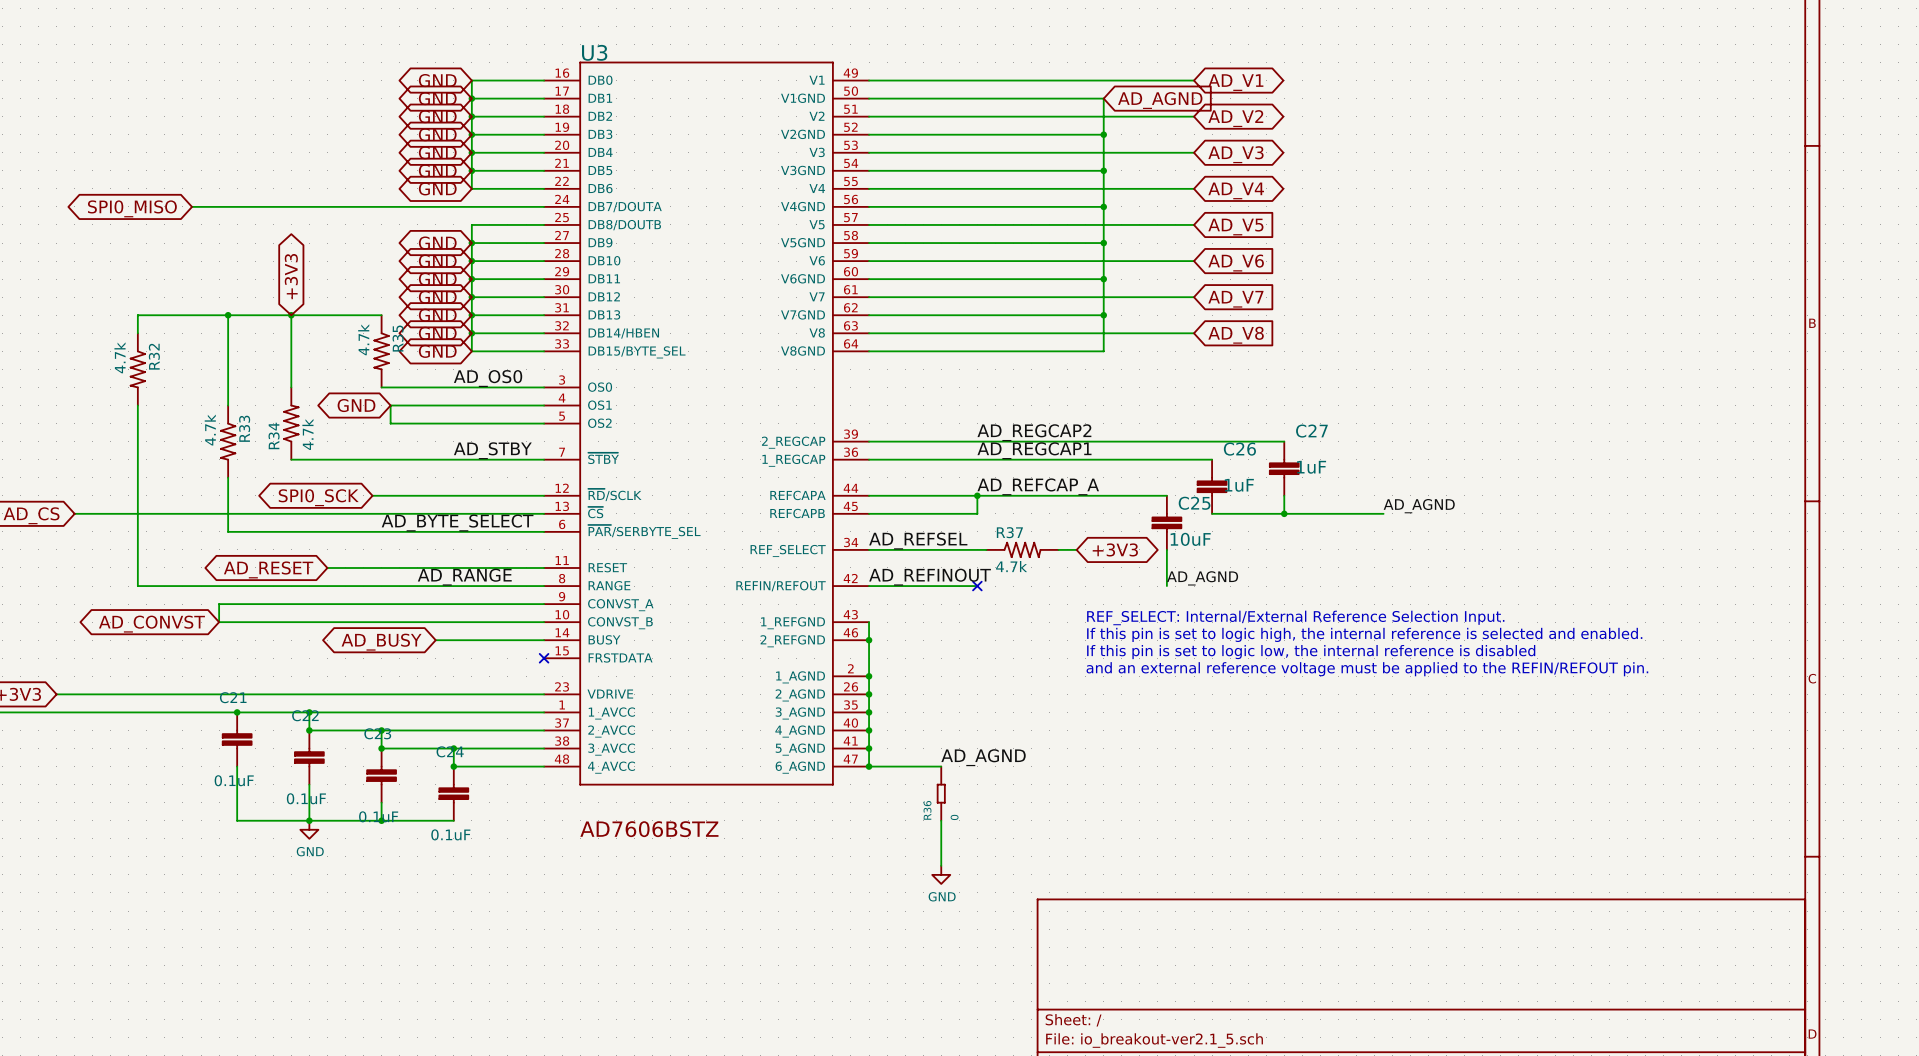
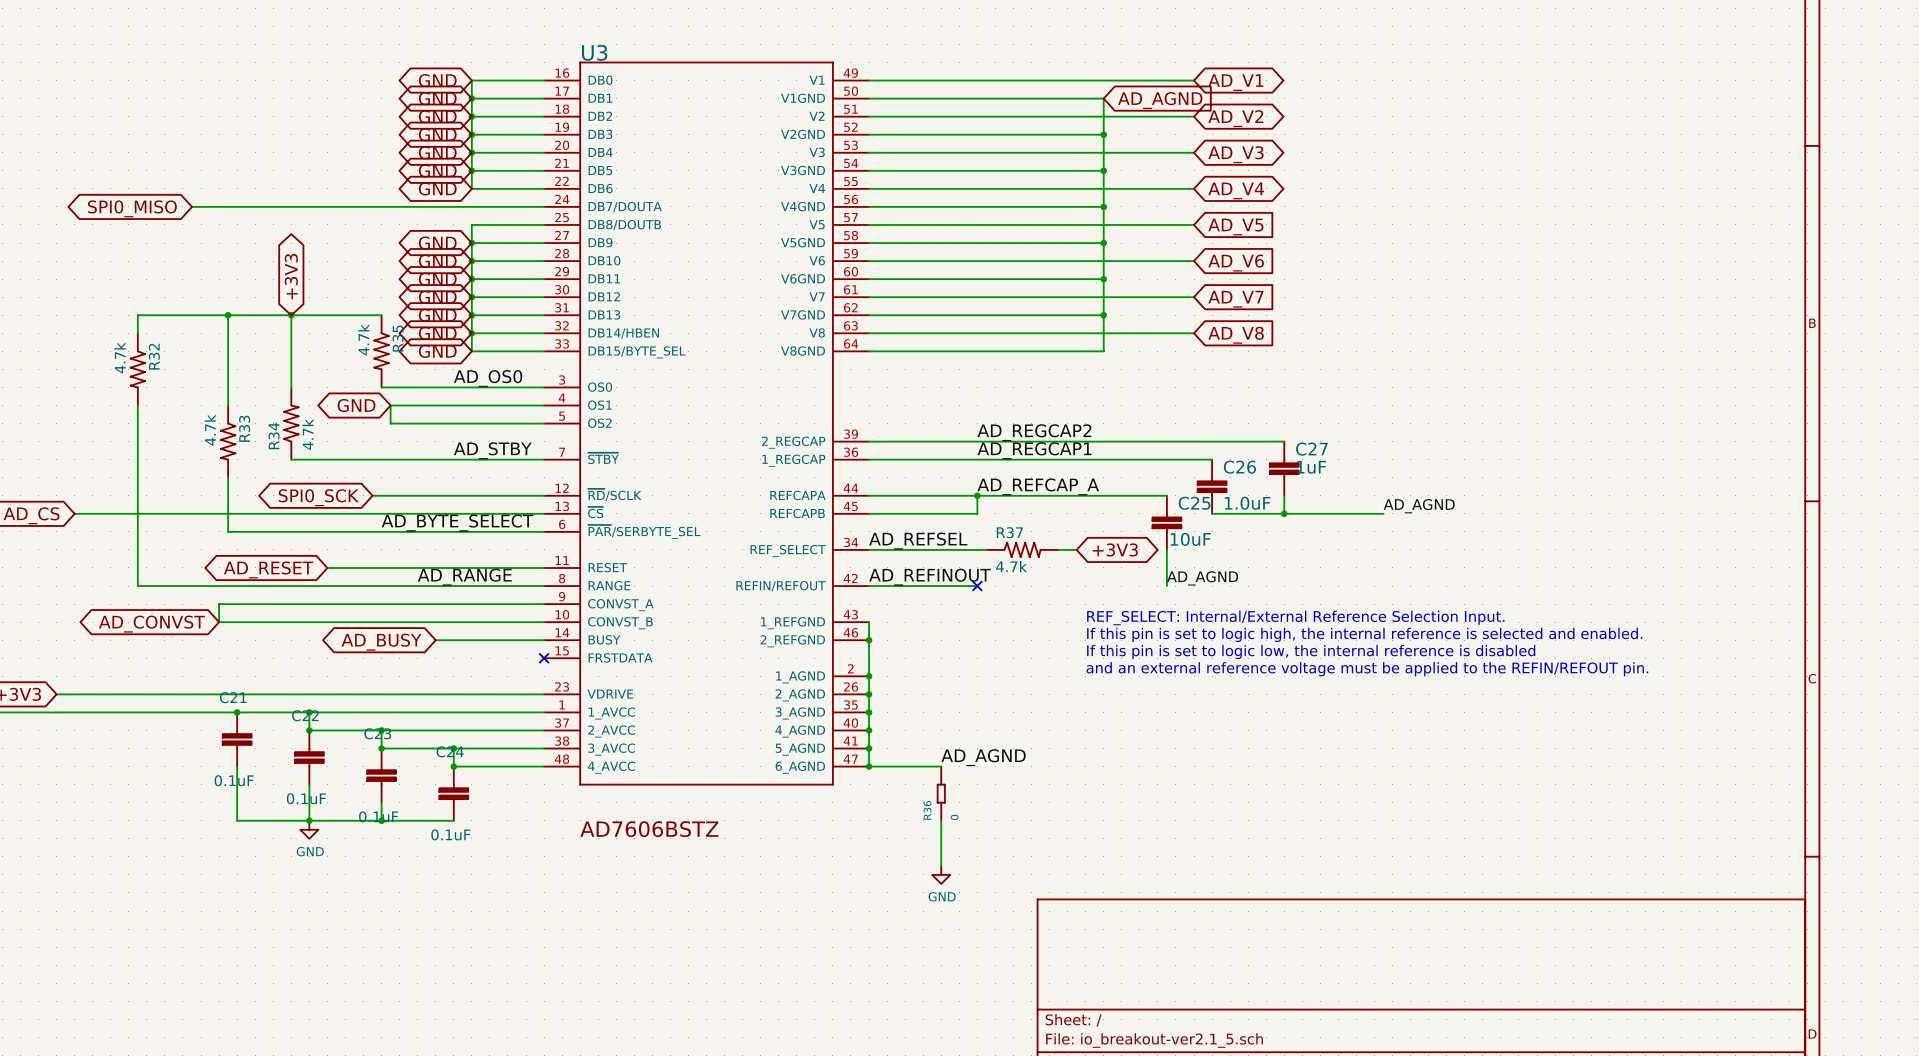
C27 name position: C27 (1311, 431) -> C27 (1311, 449)
C26 name position: C26 (1239, 449) -> C26 (1239, 467)
C26 value: 1uF (1239, 485) -> 1.0uF (1247, 503)

